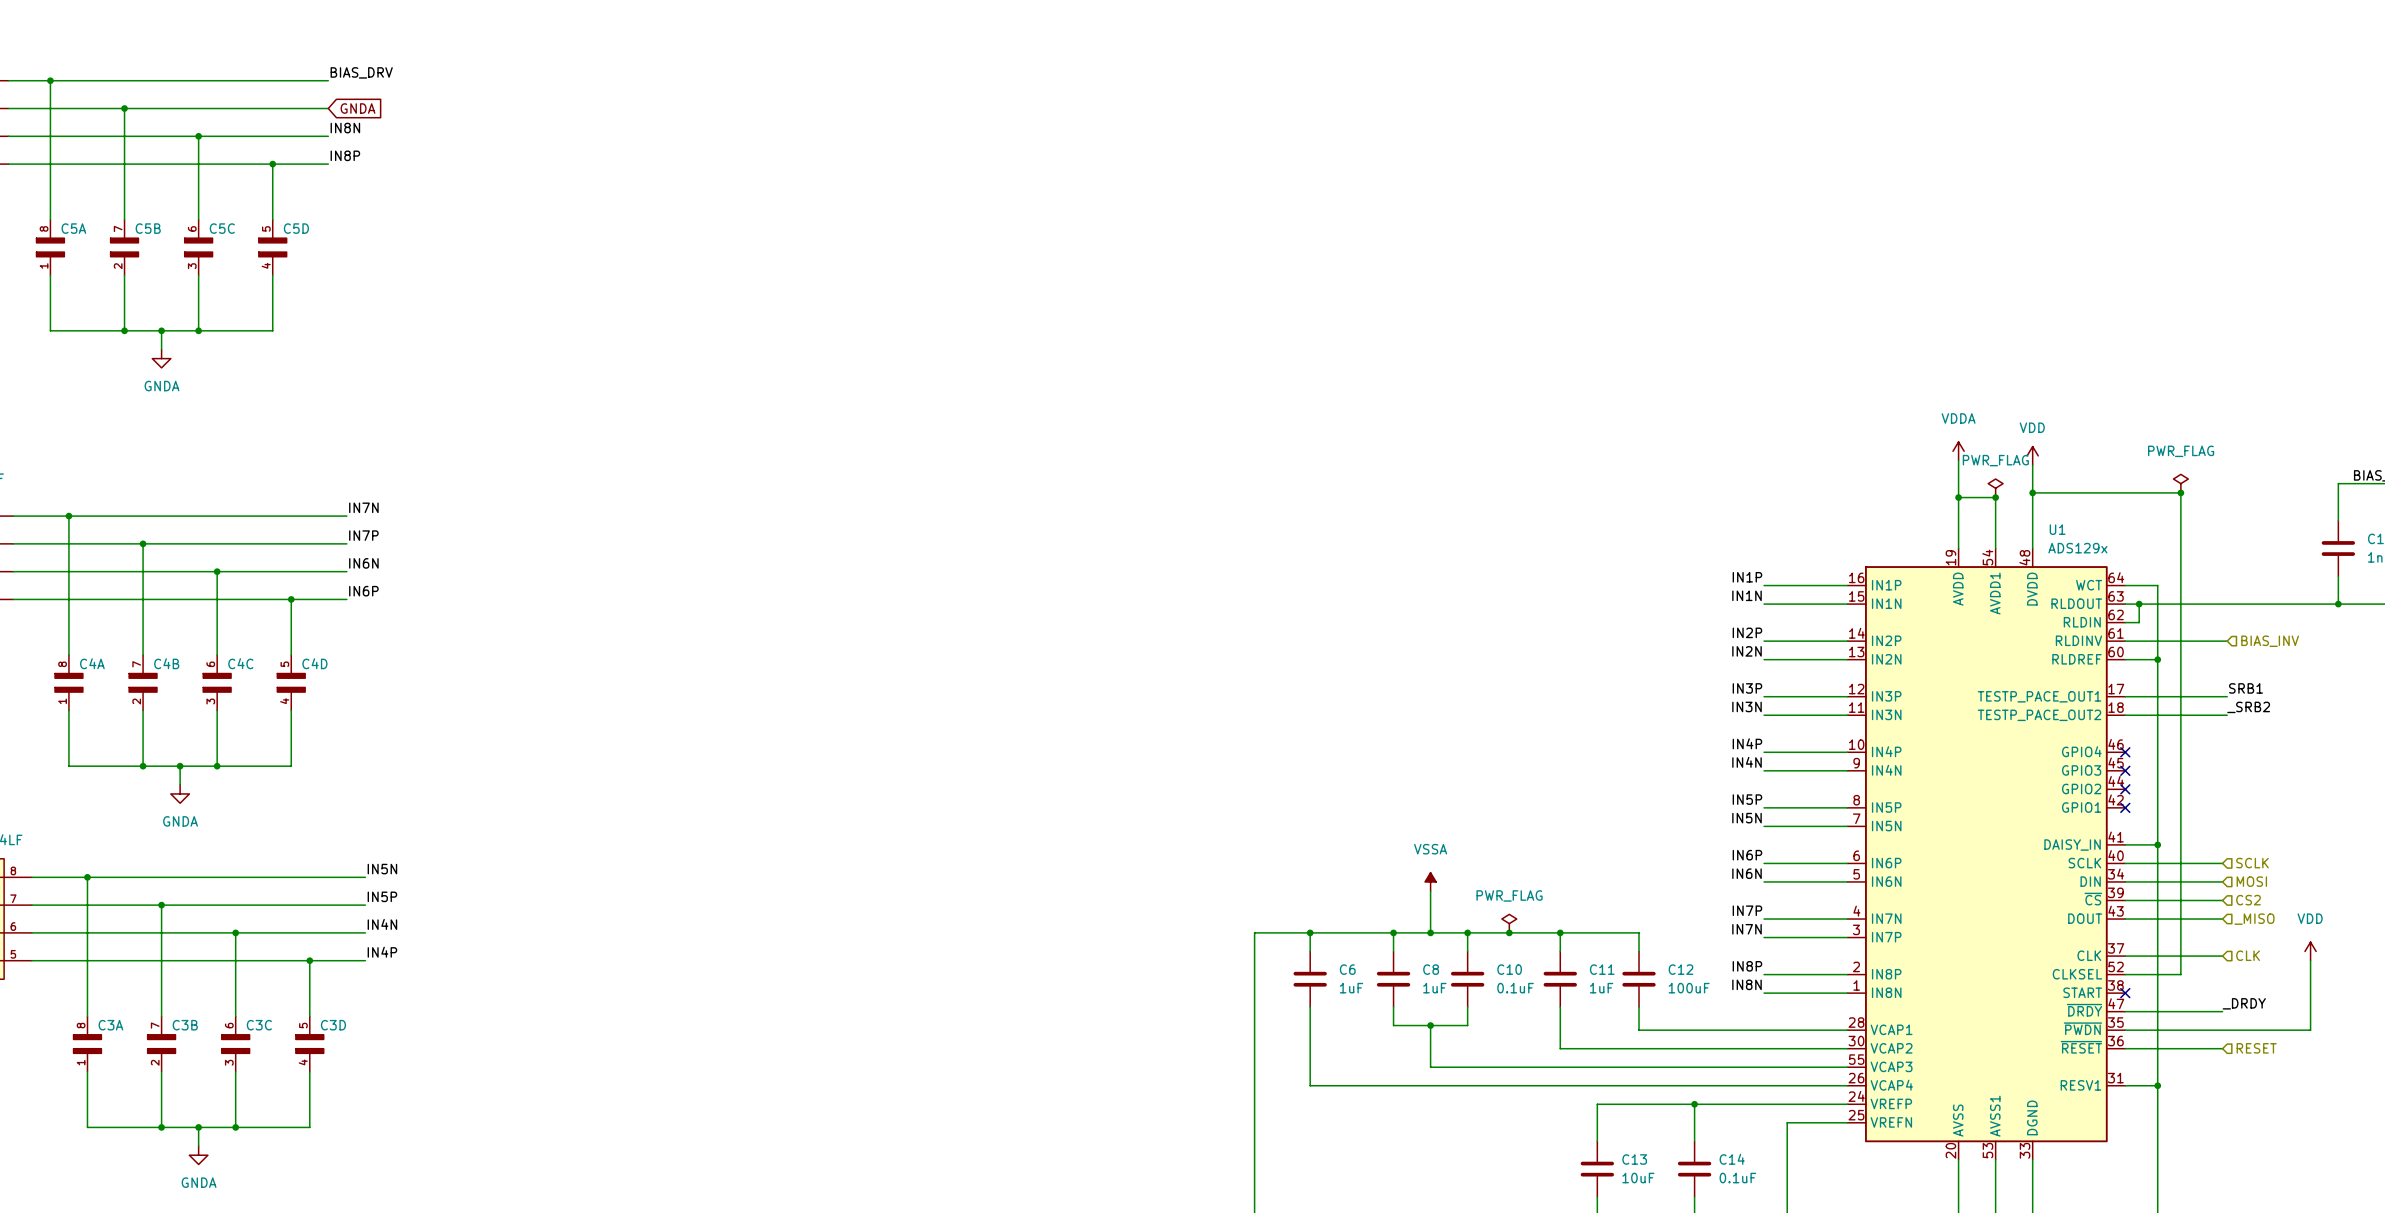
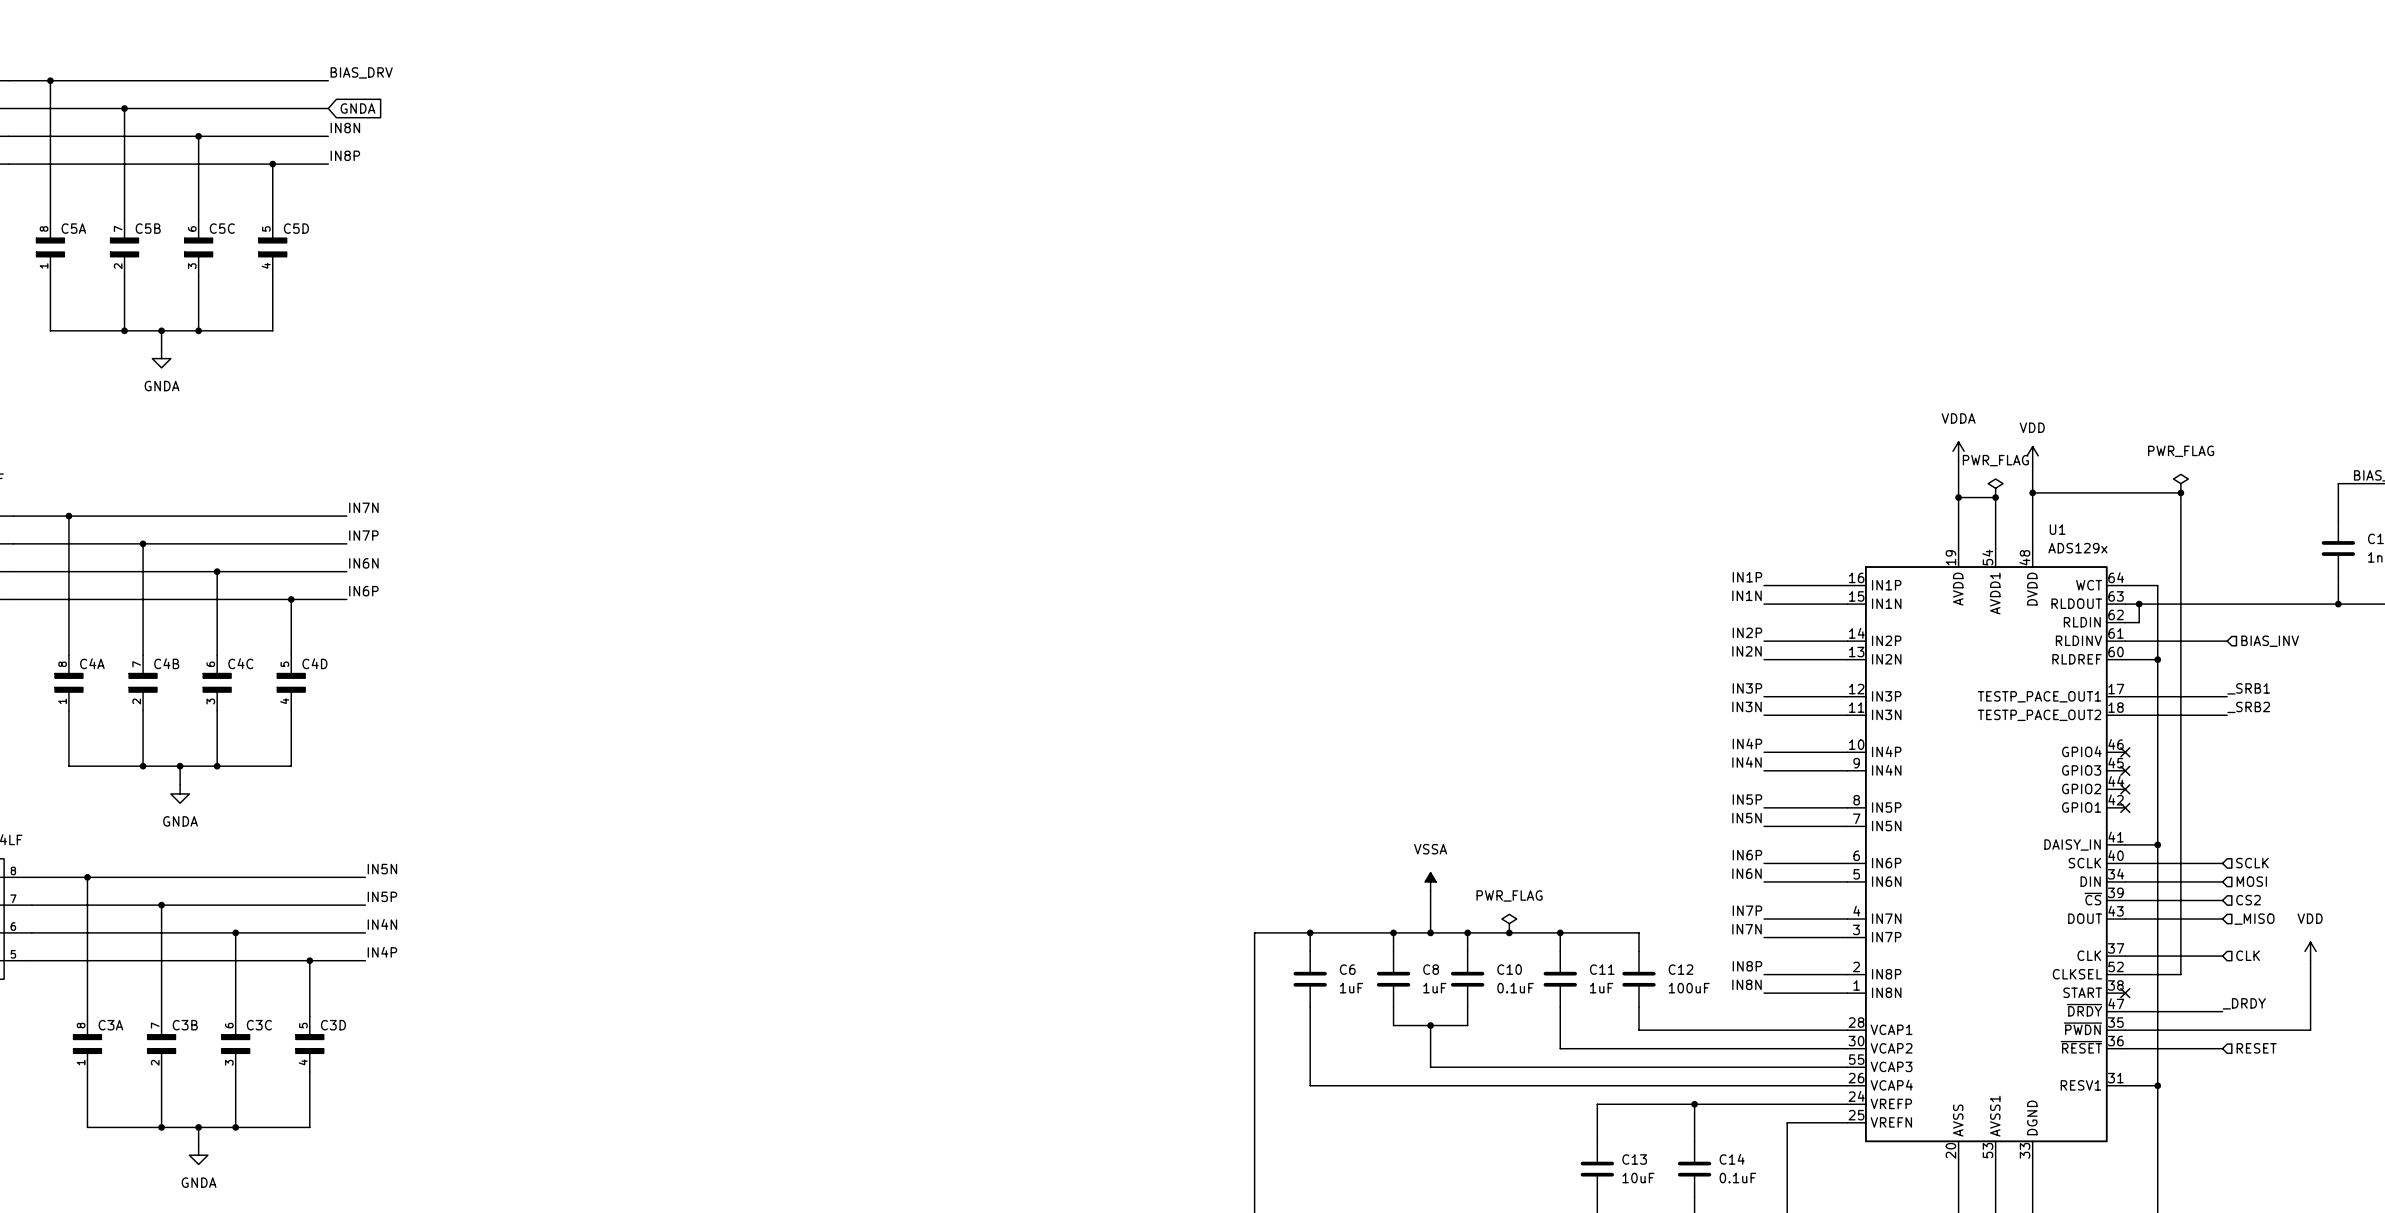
label: SRB1 (2246, 688) -> _SRB1 (2248, 688)

